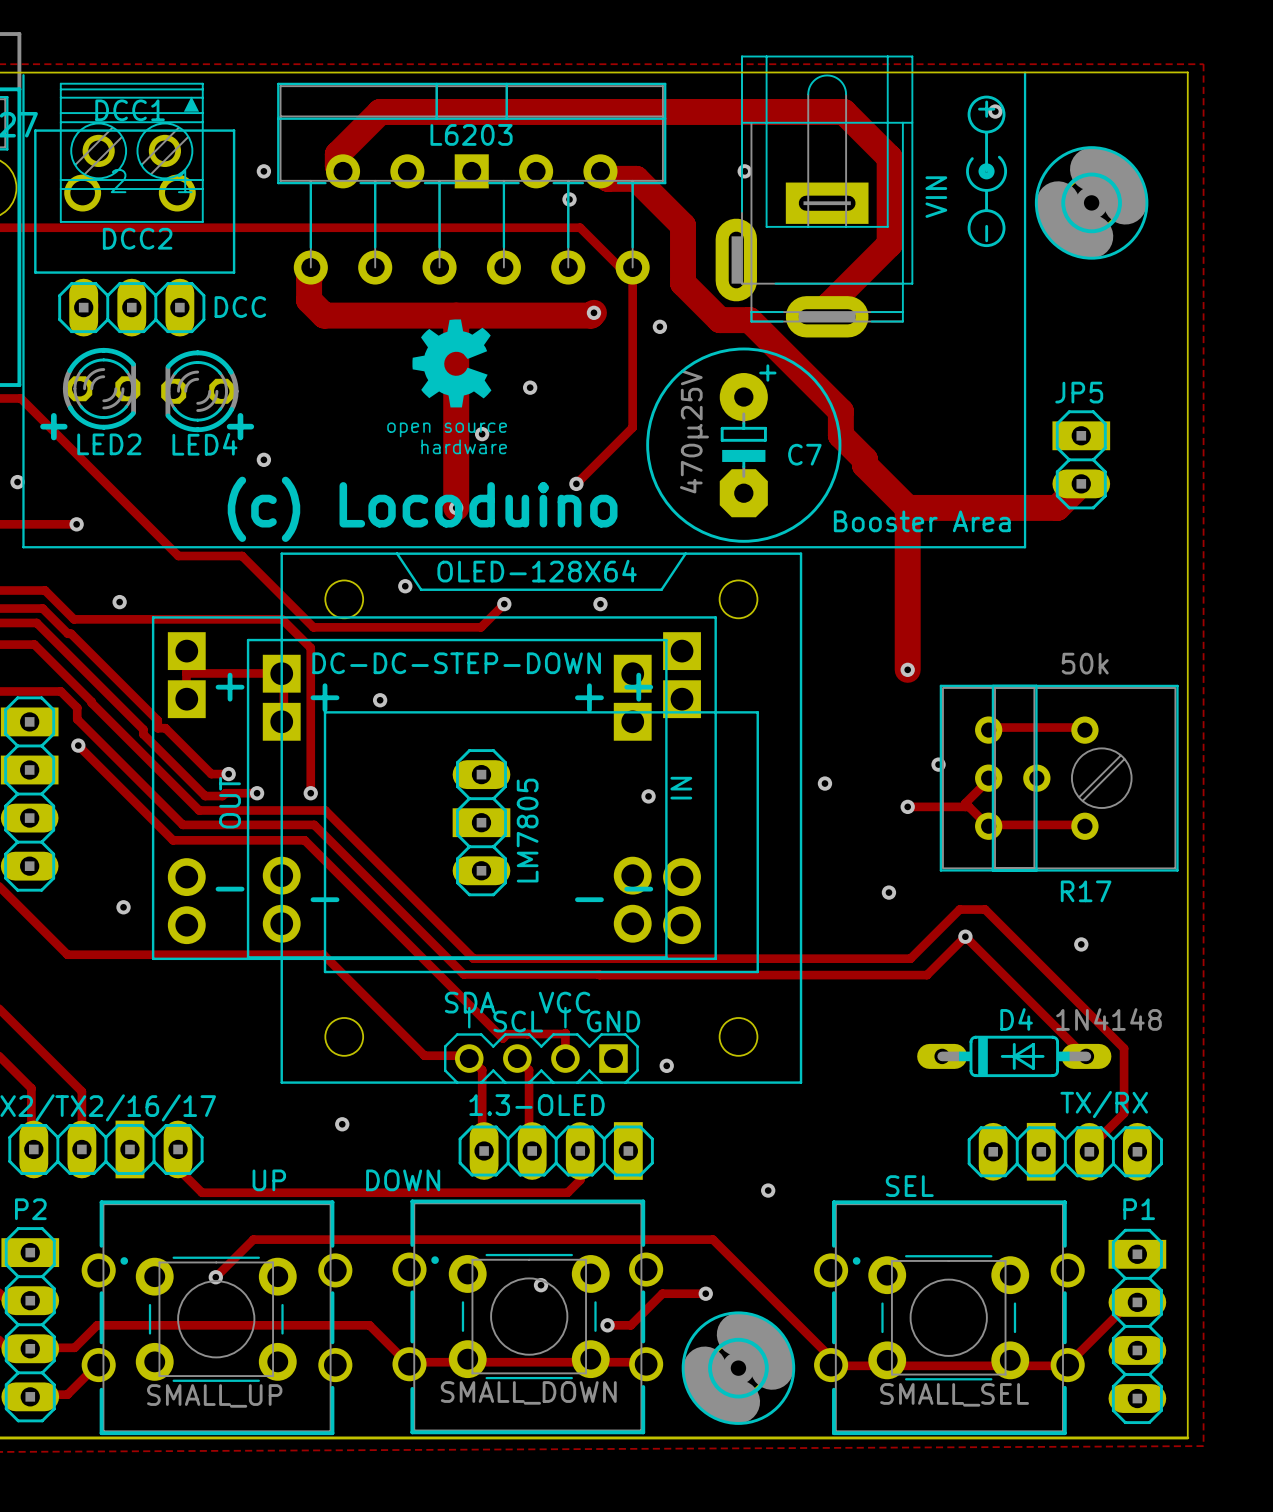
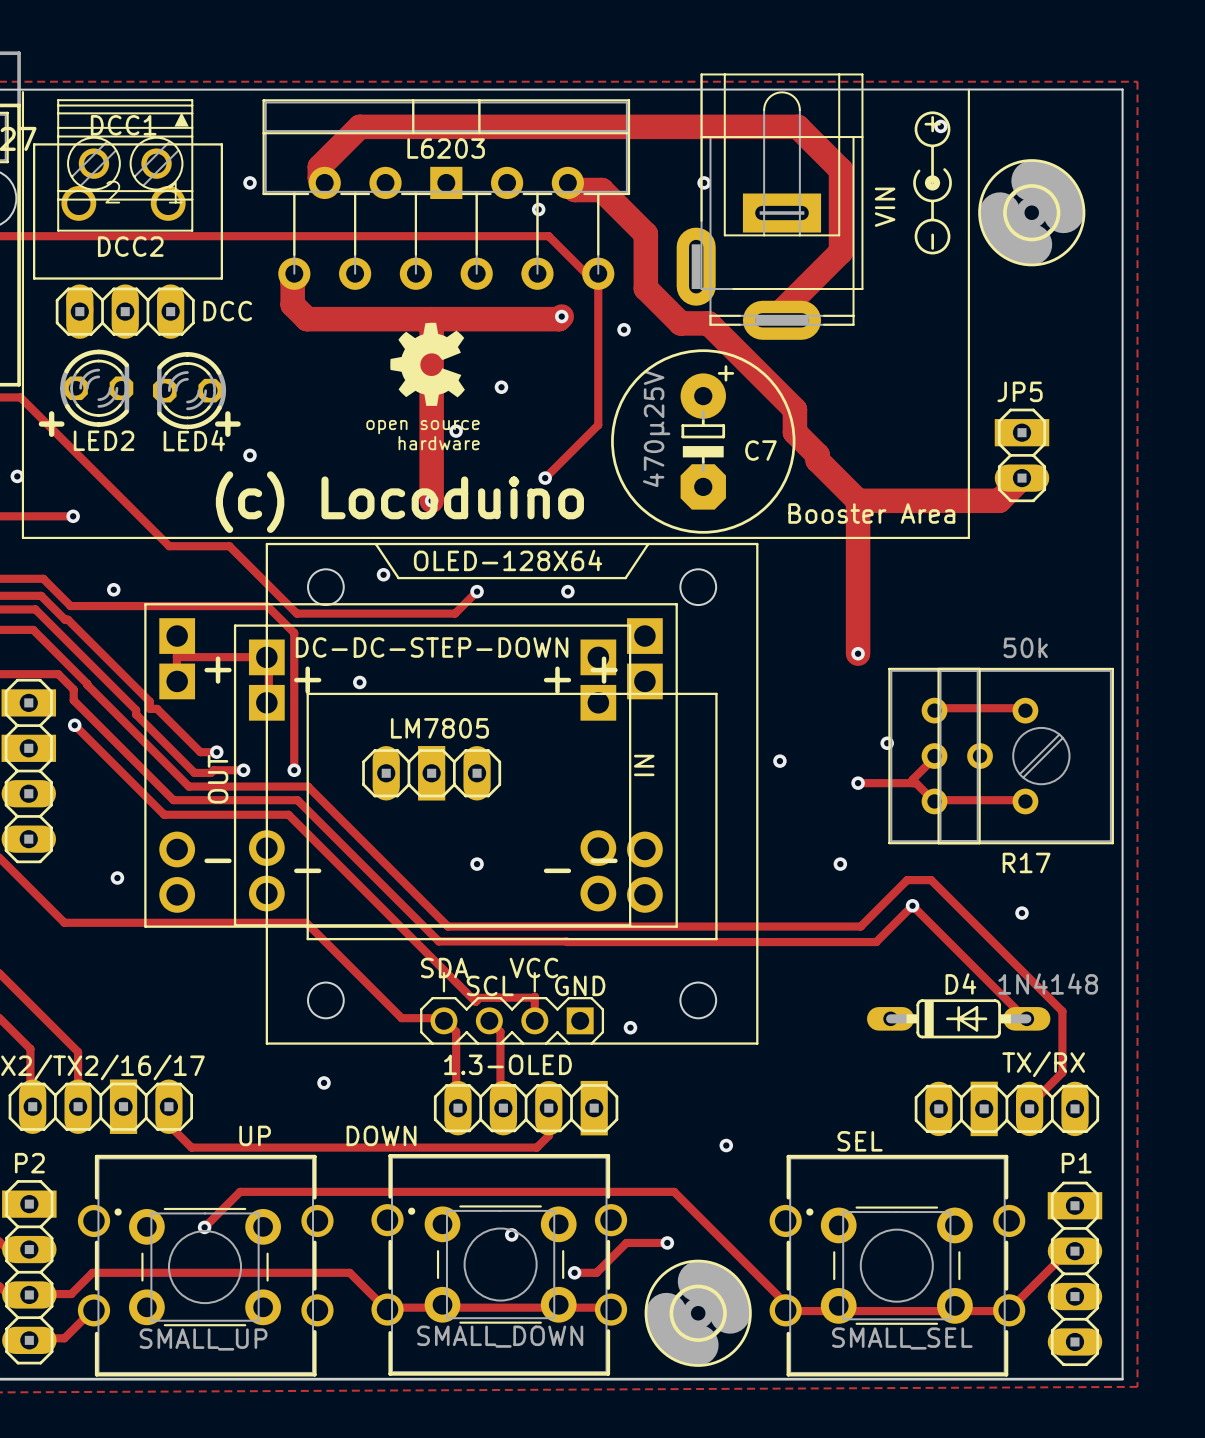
via: (648, 796) -> none
LM7805 rotation: 0° (481, 822) -> 90° clockwise (431, 773)
LM7805 name position: LM7805 (527, 830) -> LM7805 (439, 728)
via: none -> (477, 864)

